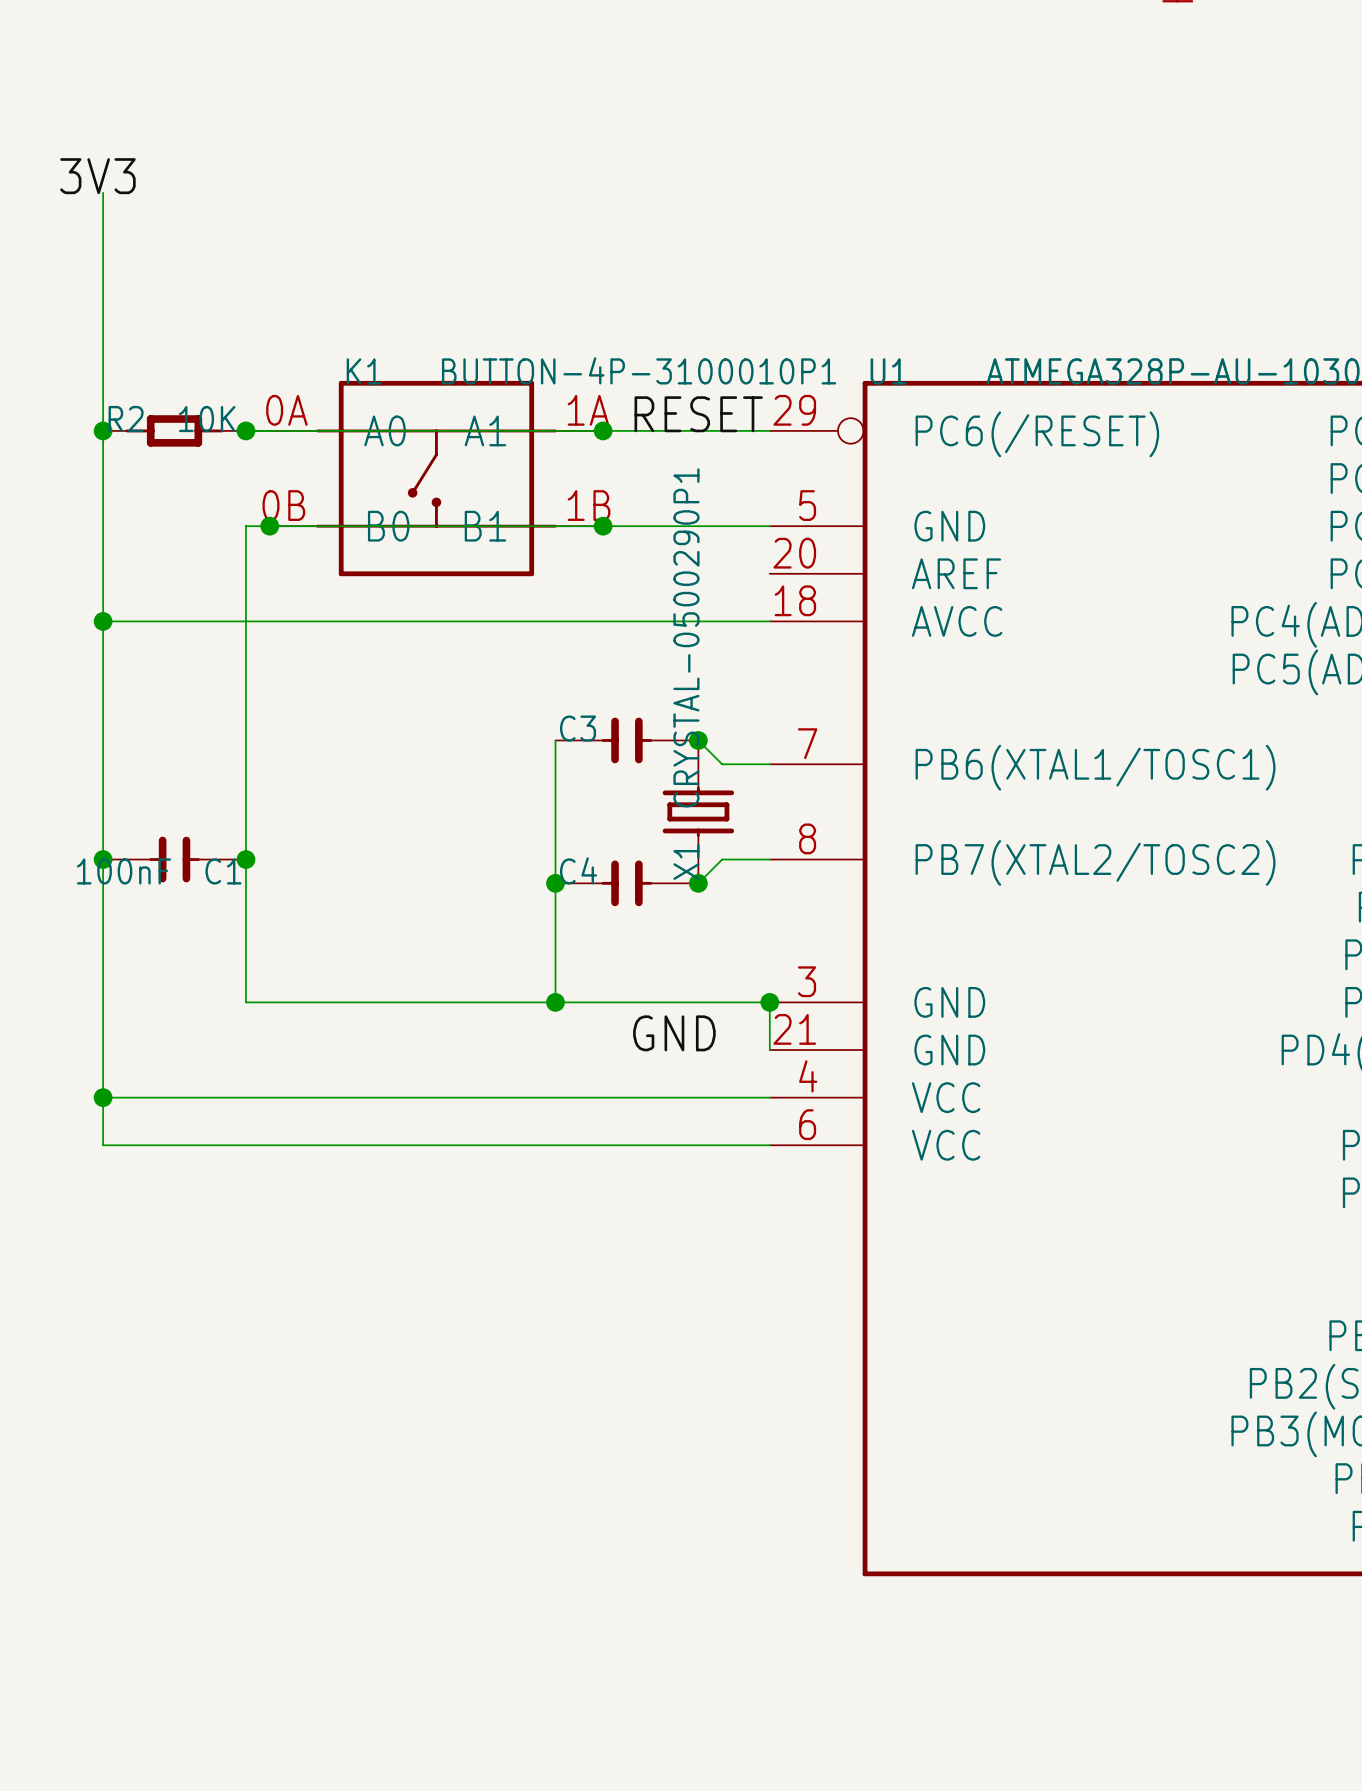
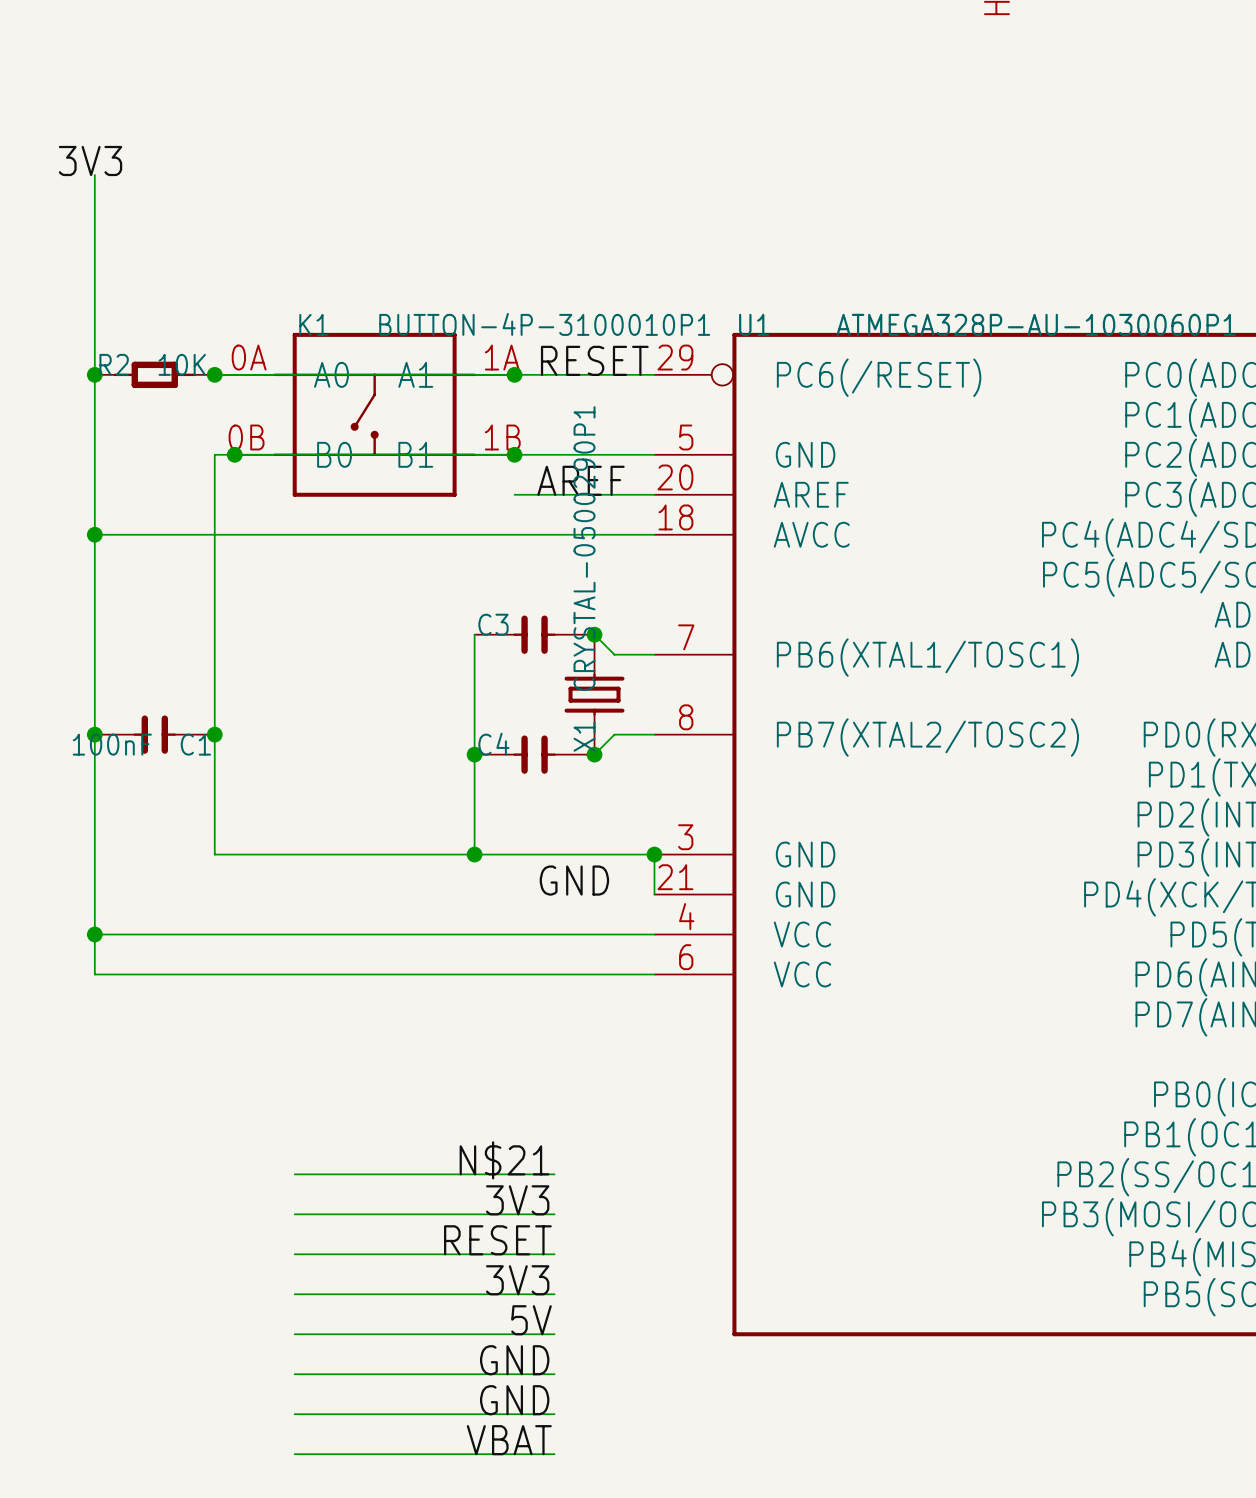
label: none -> AREF (581, 480)
wire: none -> (514, 494) (654, 494)
label: none -> N$21 (504, 1160)
wire: none -> (294, 1174) (554, 1174)
label: none -> 3V3 (517, 1200)
wire: none -> (294, 1214) (554, 1214)
label: none -> RESET (497, 1240)
wire: none -> (294, 1254) (554, 1254)
label: none -> 3V3 (517, 1280)
wire: none -> (294, 1294) (554, 1294)
label: none -> 5V (531, 1320)
wire: none -> (294, 1334) (554, 1334)
label: none -> GND (514, 1360)
wire: none -> (294, 1374) (554, 1374)
label: none -> GND (514, 1400)
wire: none -> (294, 1414) (554, 1414)
label: none -> VBAT (509, 1440)
wire: none -> (294, 1454) (554, 1454)

